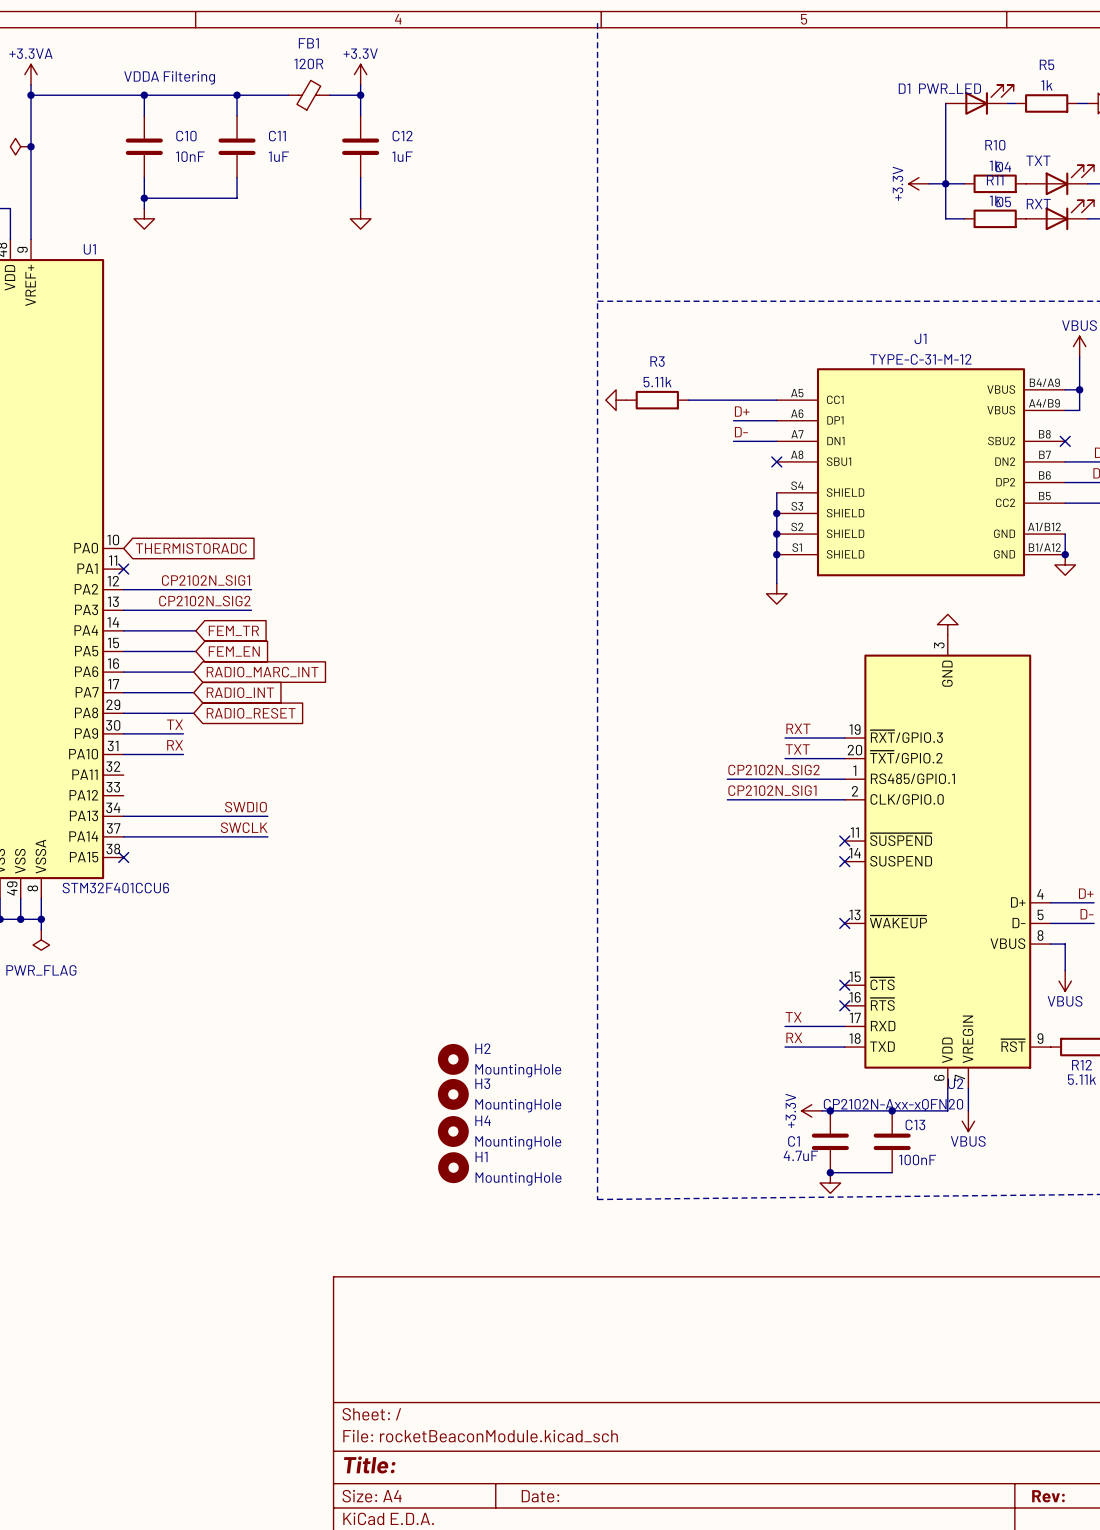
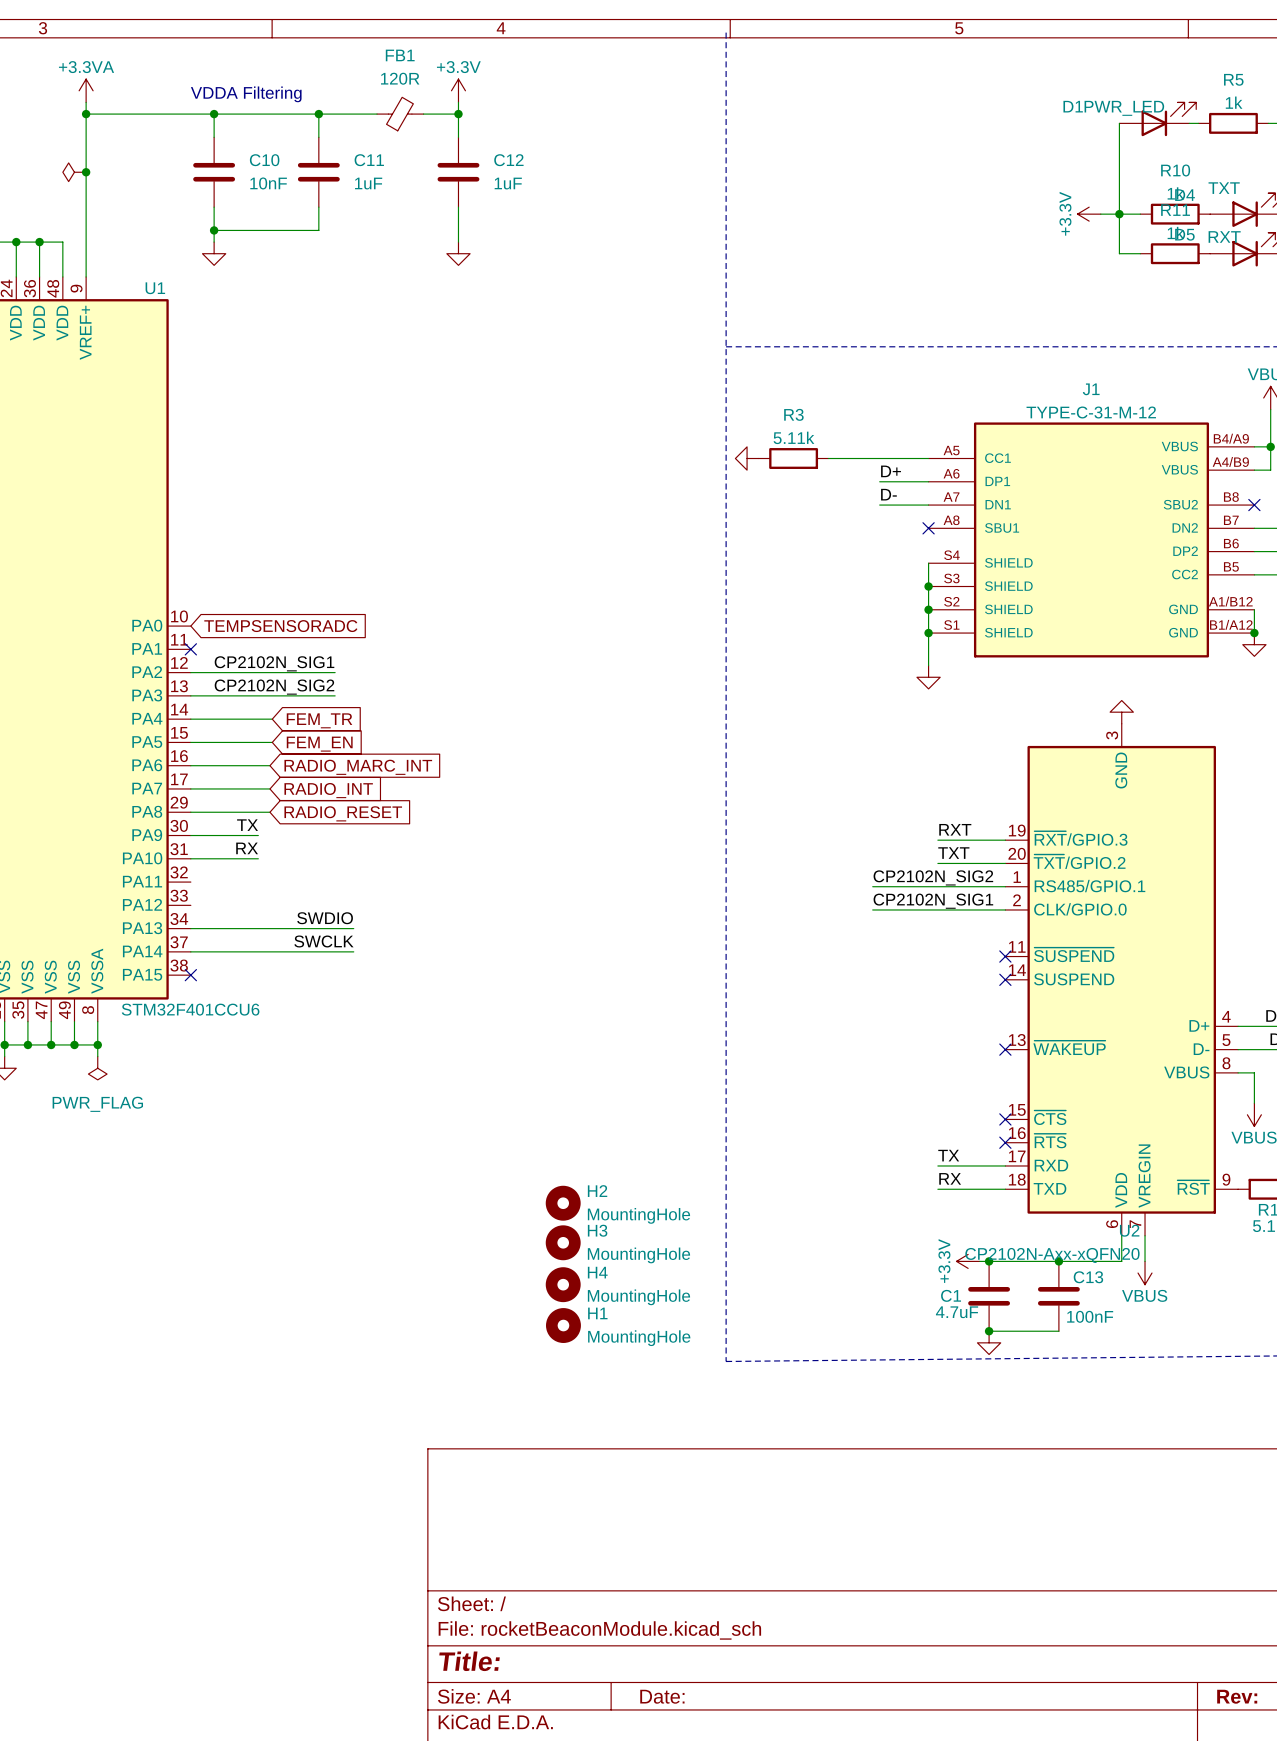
global label: THERMISTORADC (191, 548) -> TEMPSENSORADC (280, 626)

